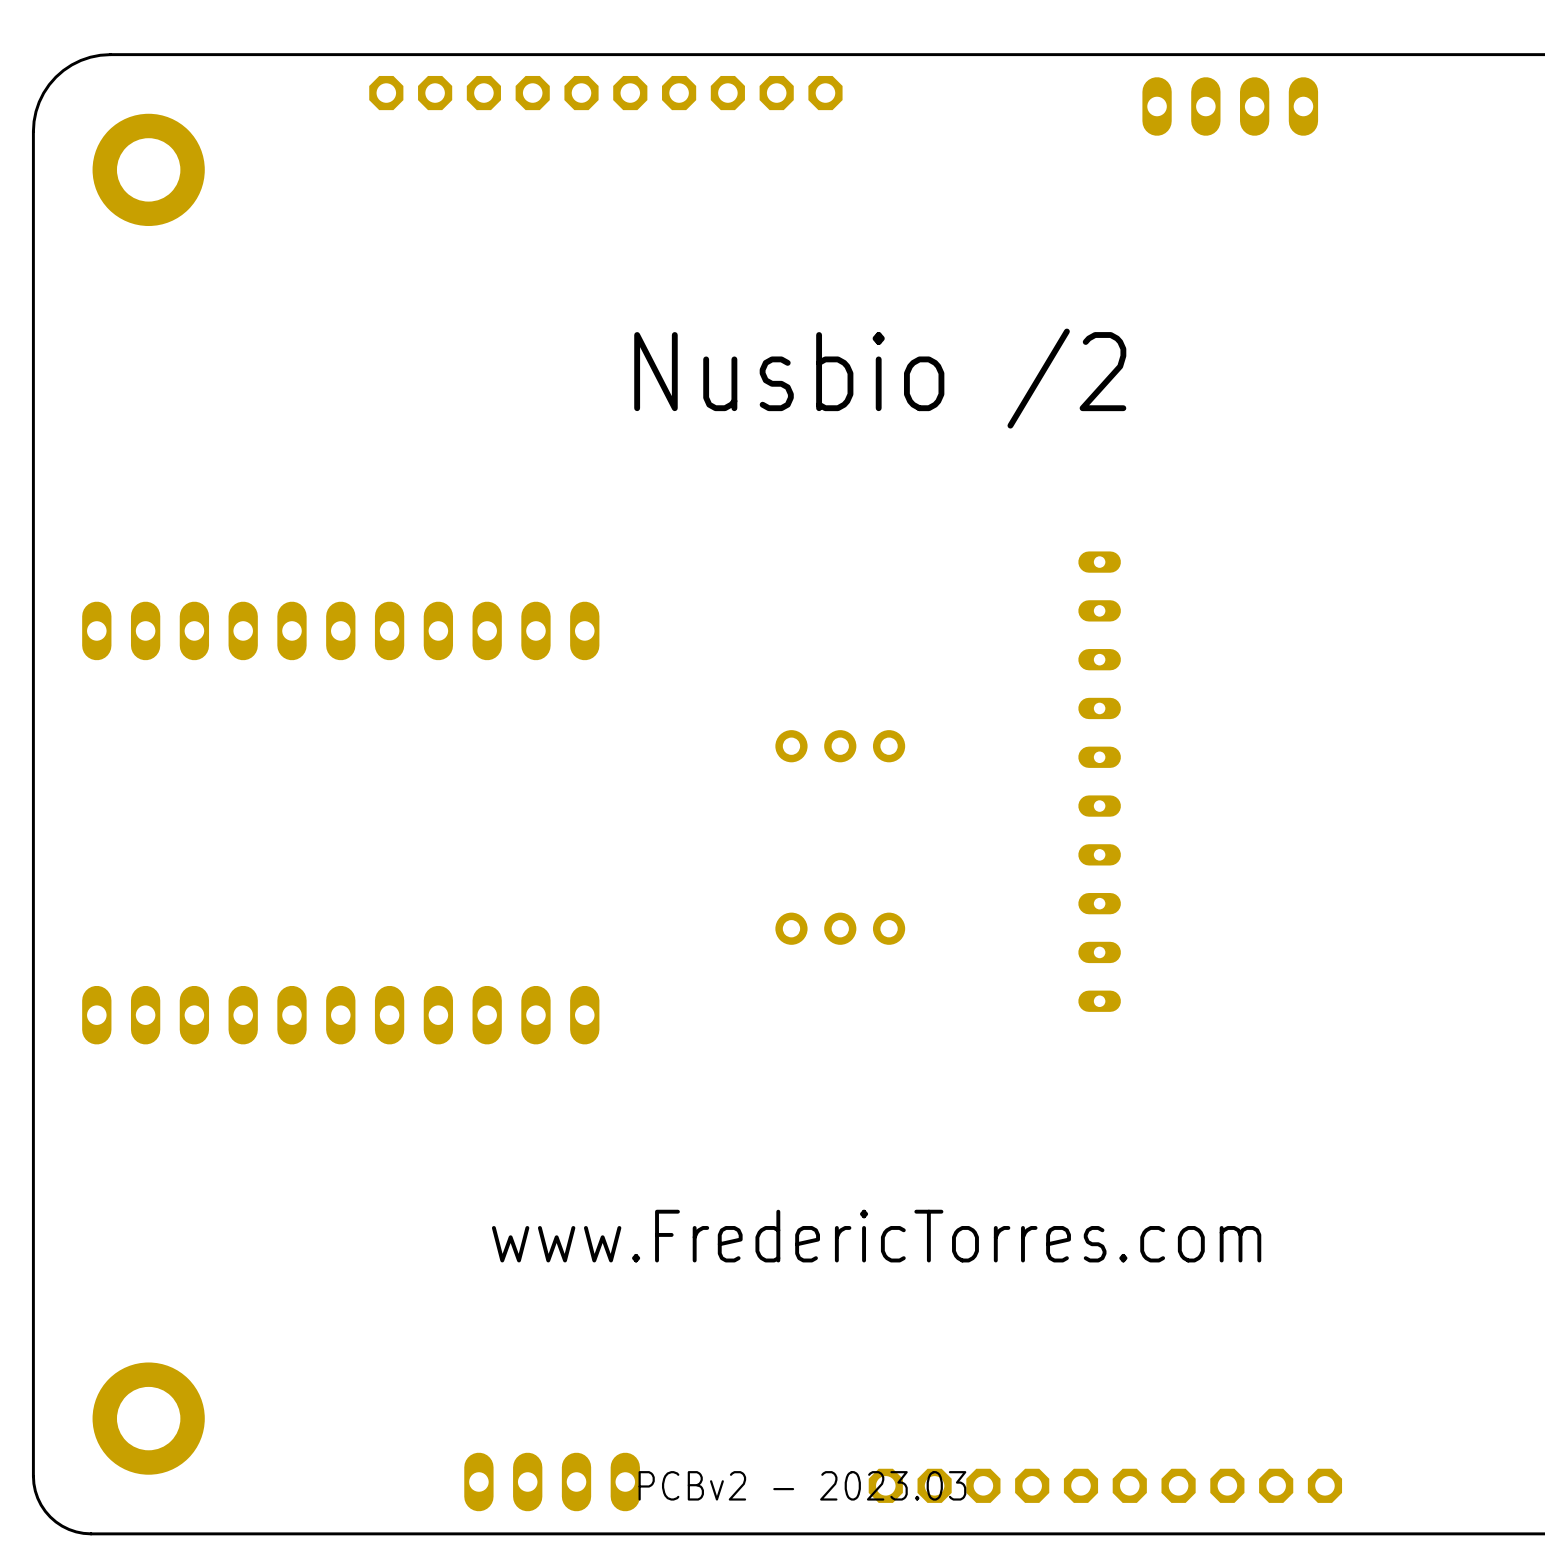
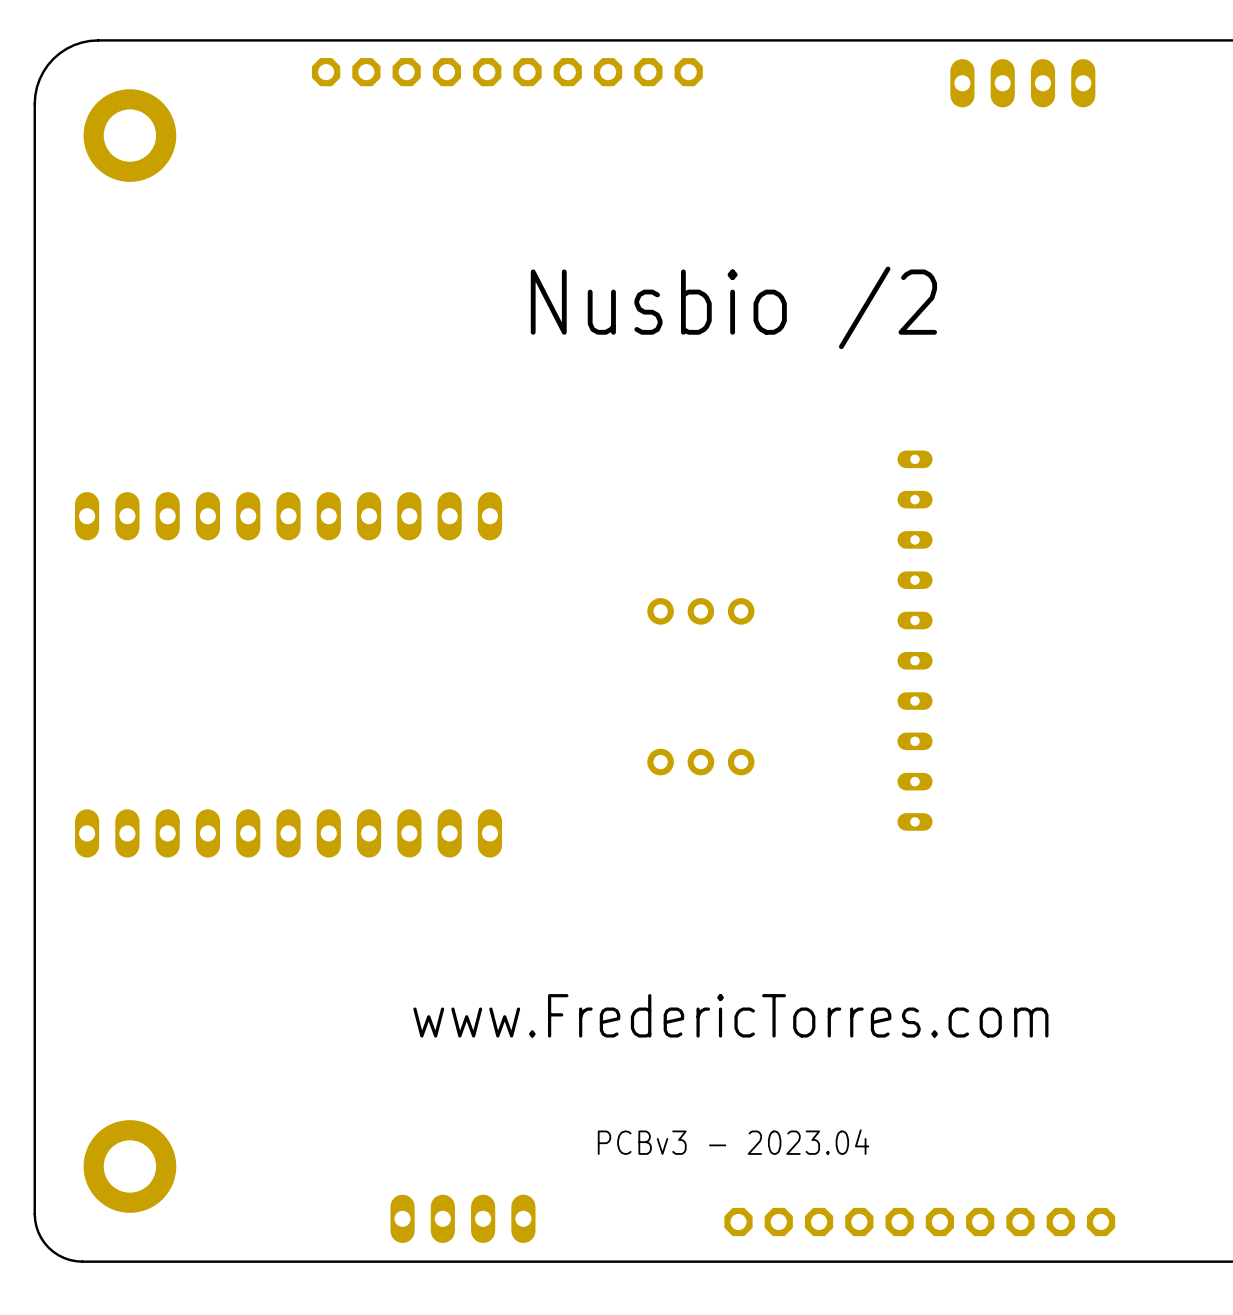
text: none -> PCBv3 - 2023.04 (733, 1142)
text: PCBv2 - 2023.03 (802, 1485) -> none

